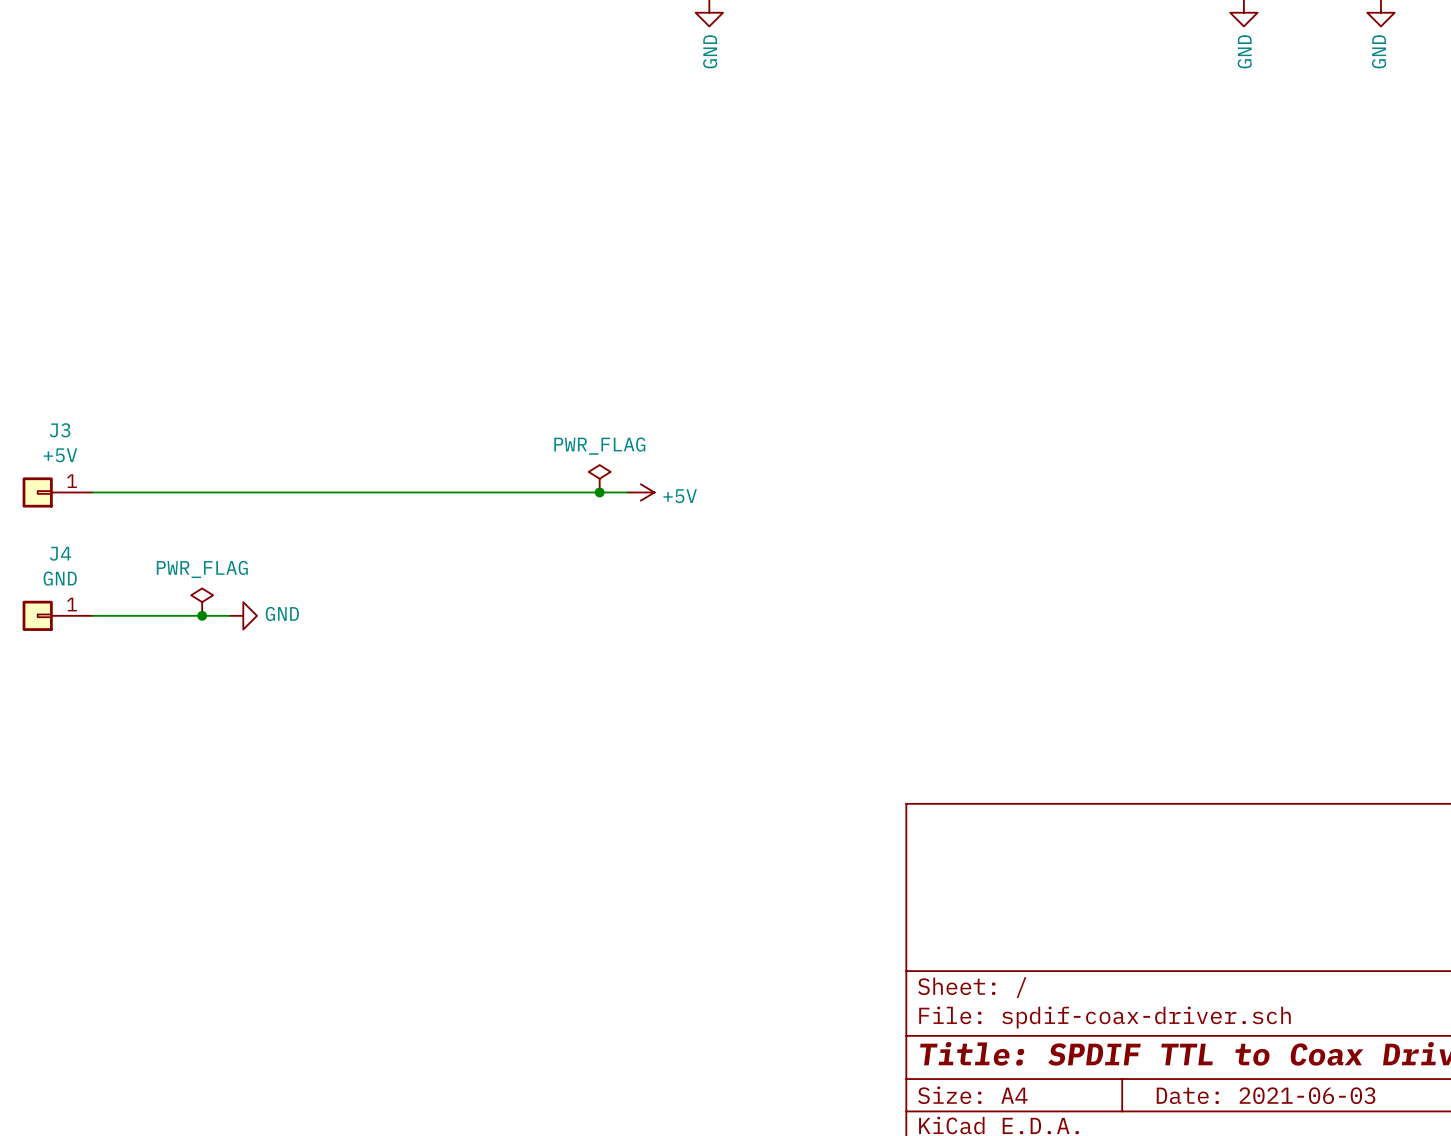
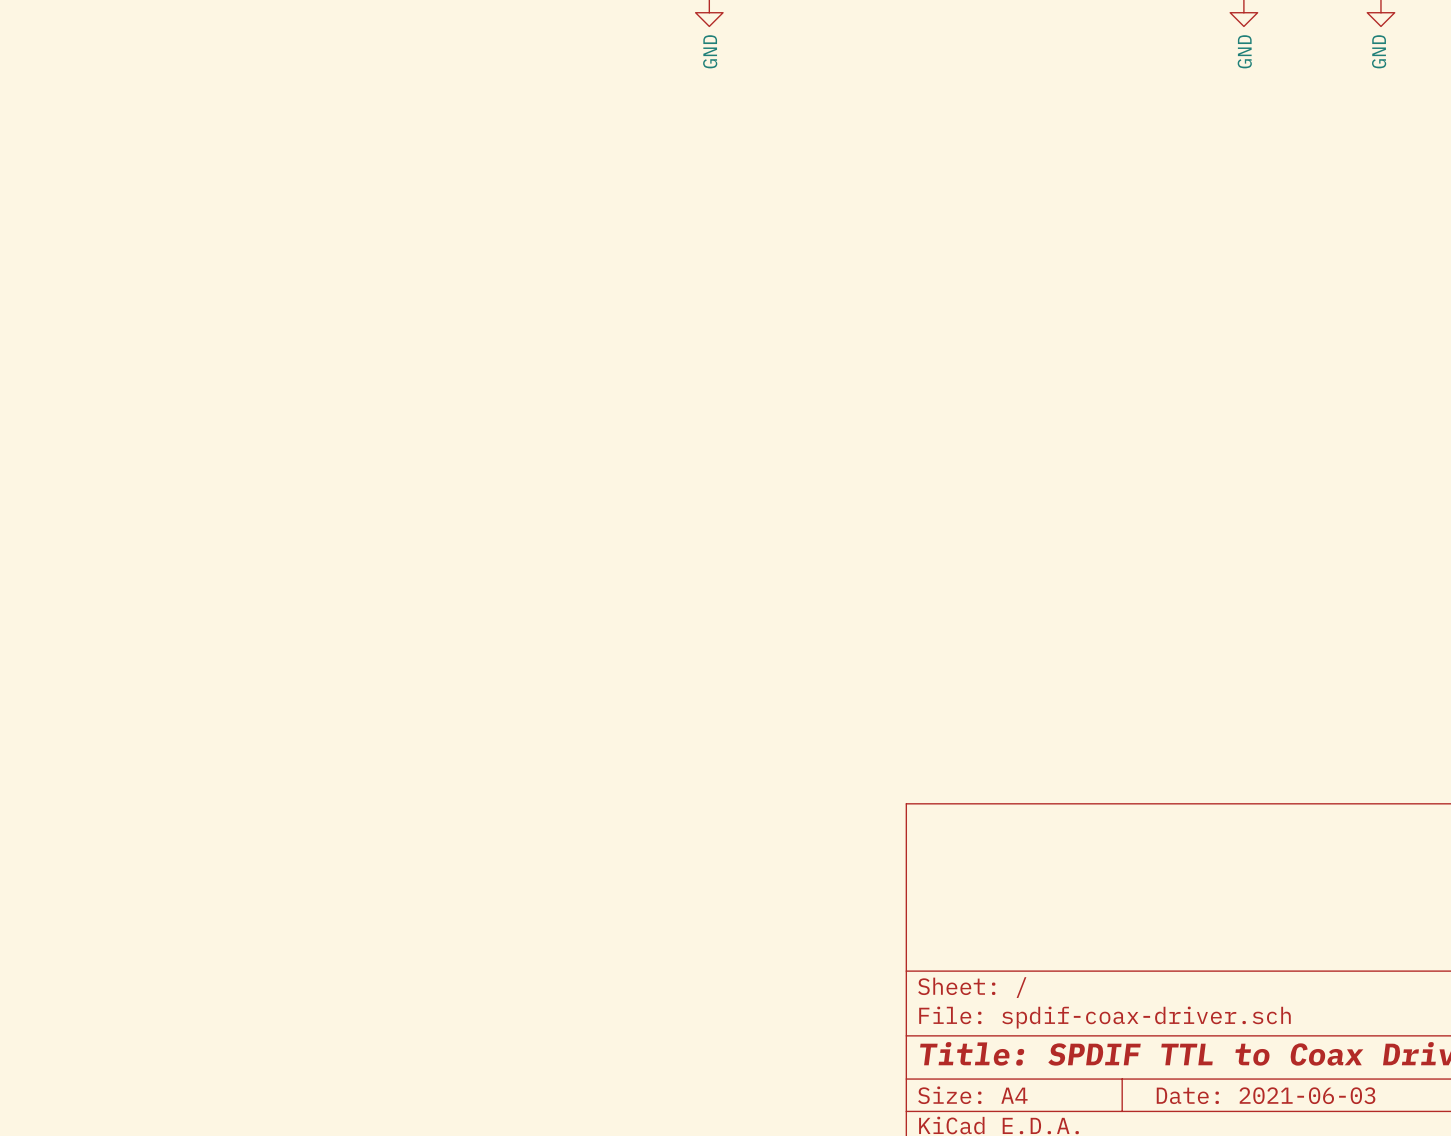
power symbol: PWR_FLAG (599, 478) -> none
J3: +5V (57, 492) -> none
wire: (92, 492) (627, 492) -> none
junction: (599, 492) -> none
power symbol: +5V (640, 492) -> none
power symbol: PWR_FLAG (202, 602) -> none
J4: GND (57, 615) -> none
wire: (92, 615) (229, 615) -> none
junction: (202, 615) -> none
power symbol: GND (243, 615) -> none

